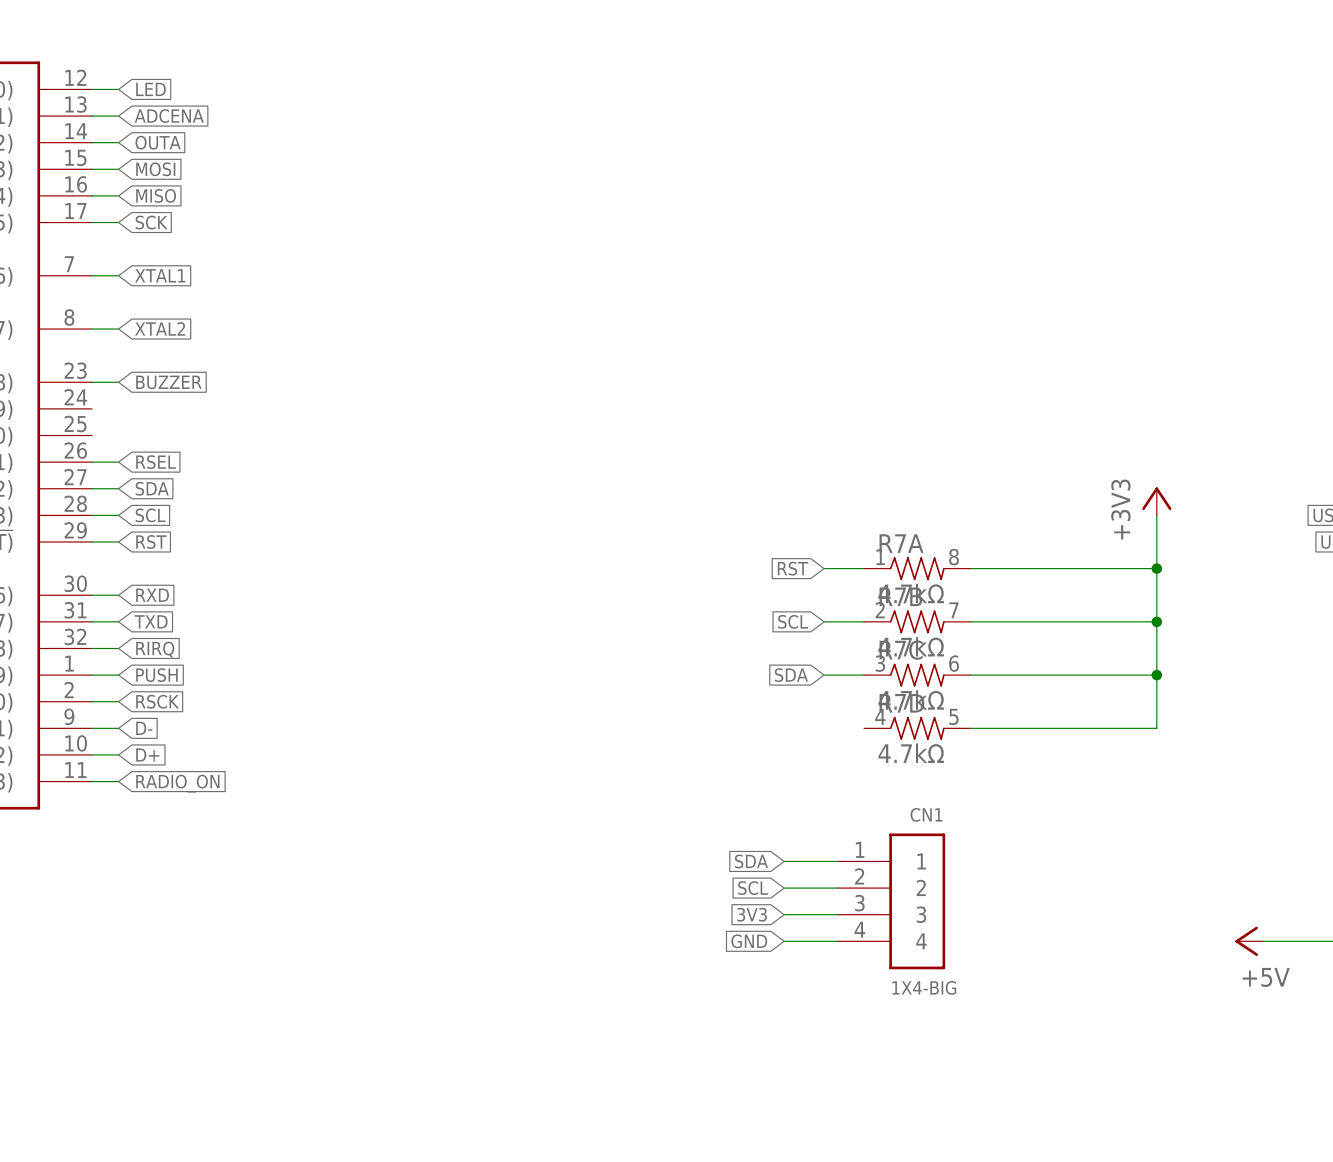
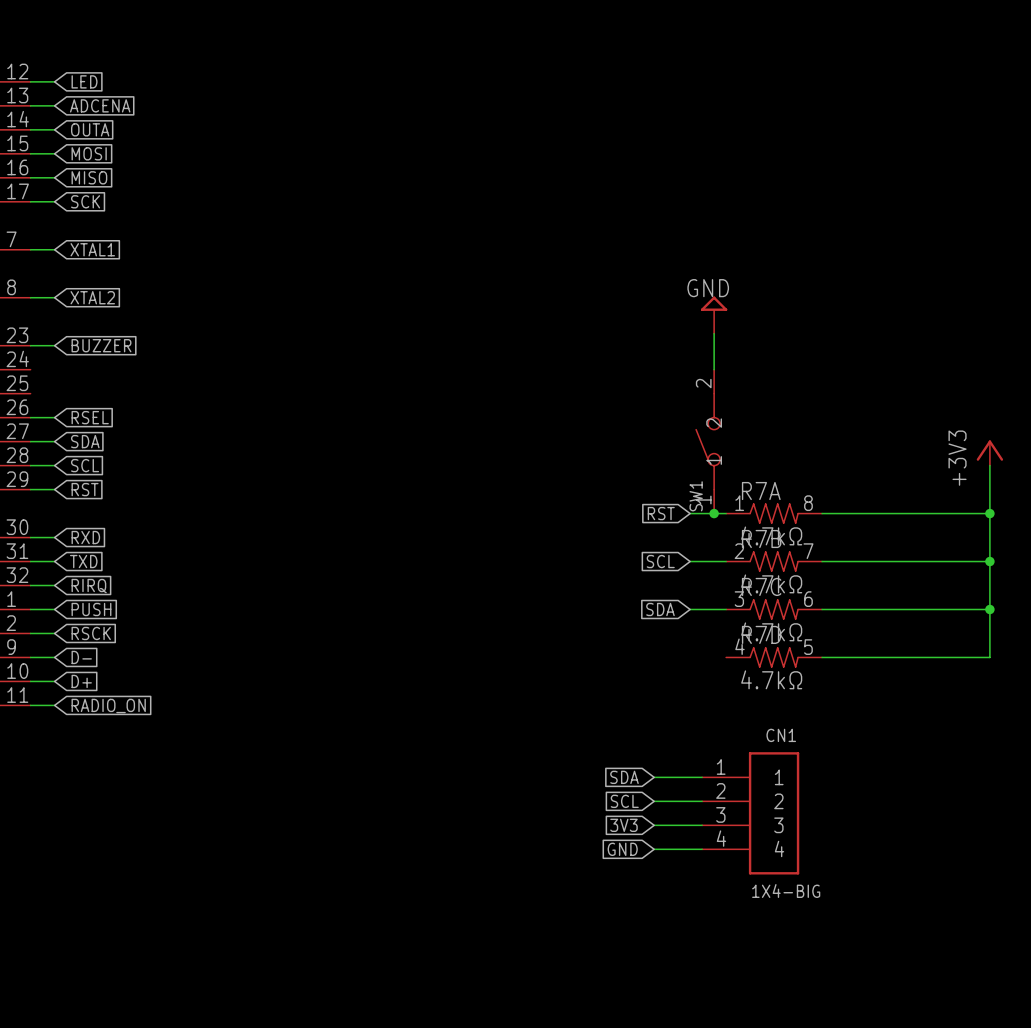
power symbol: none -> GND (714, 315)
wire: none -> (714, 333) (714, 369)
SW1: none -> (708, 441)
junction: none -> (714, 513)

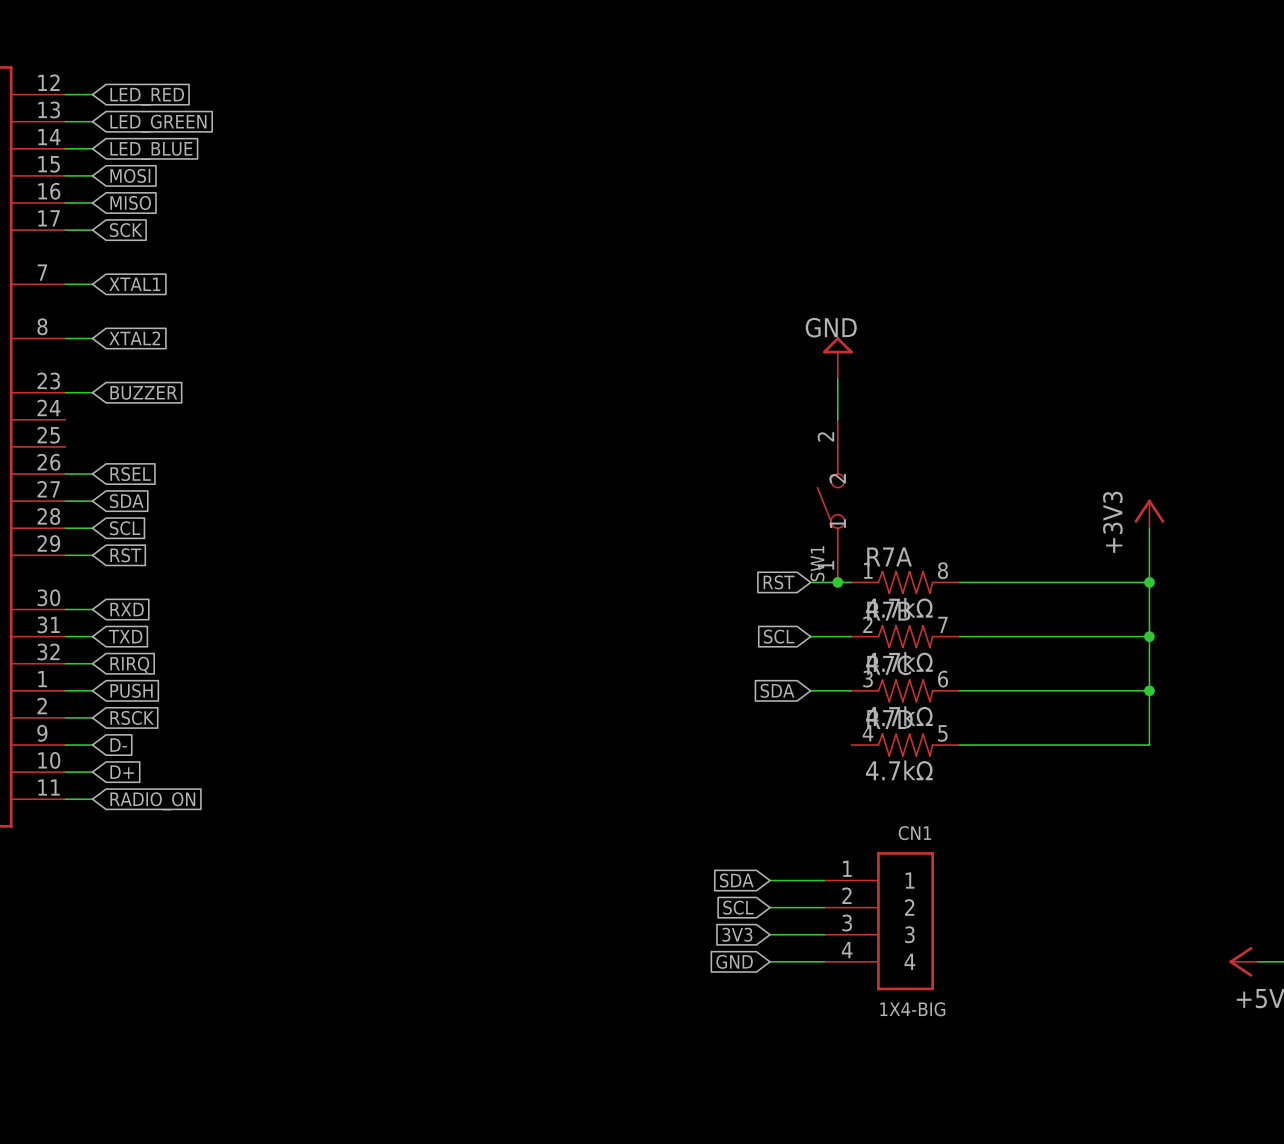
global label: LED (84, 81) -> LED_RED (147, 96)
global label: ADCENA (100, 105) -> LED_GREEN (158, 123)
global label: OUTA (90, 129) -> LED_BLUE (151, 150)

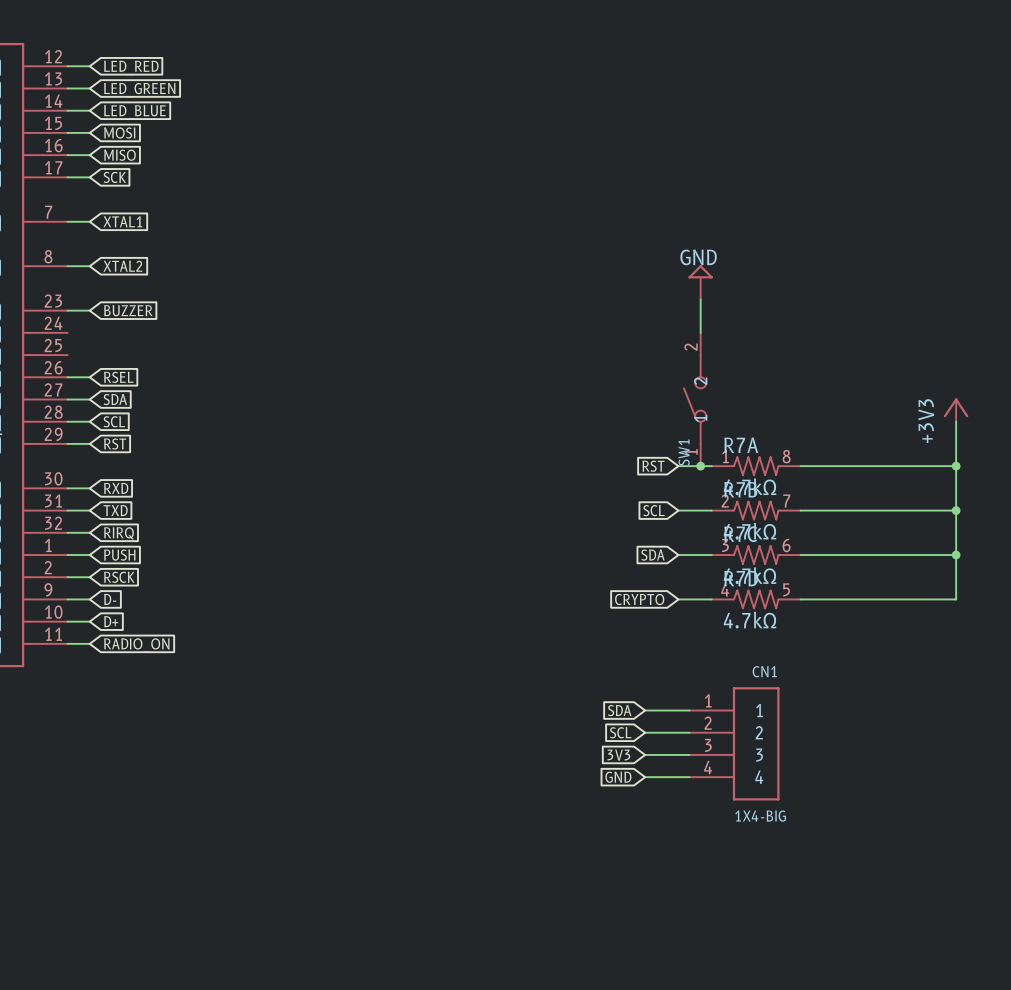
global label: none -> CRYPTO (639, 599)
wire: none -> (678, 599) (711, 599)

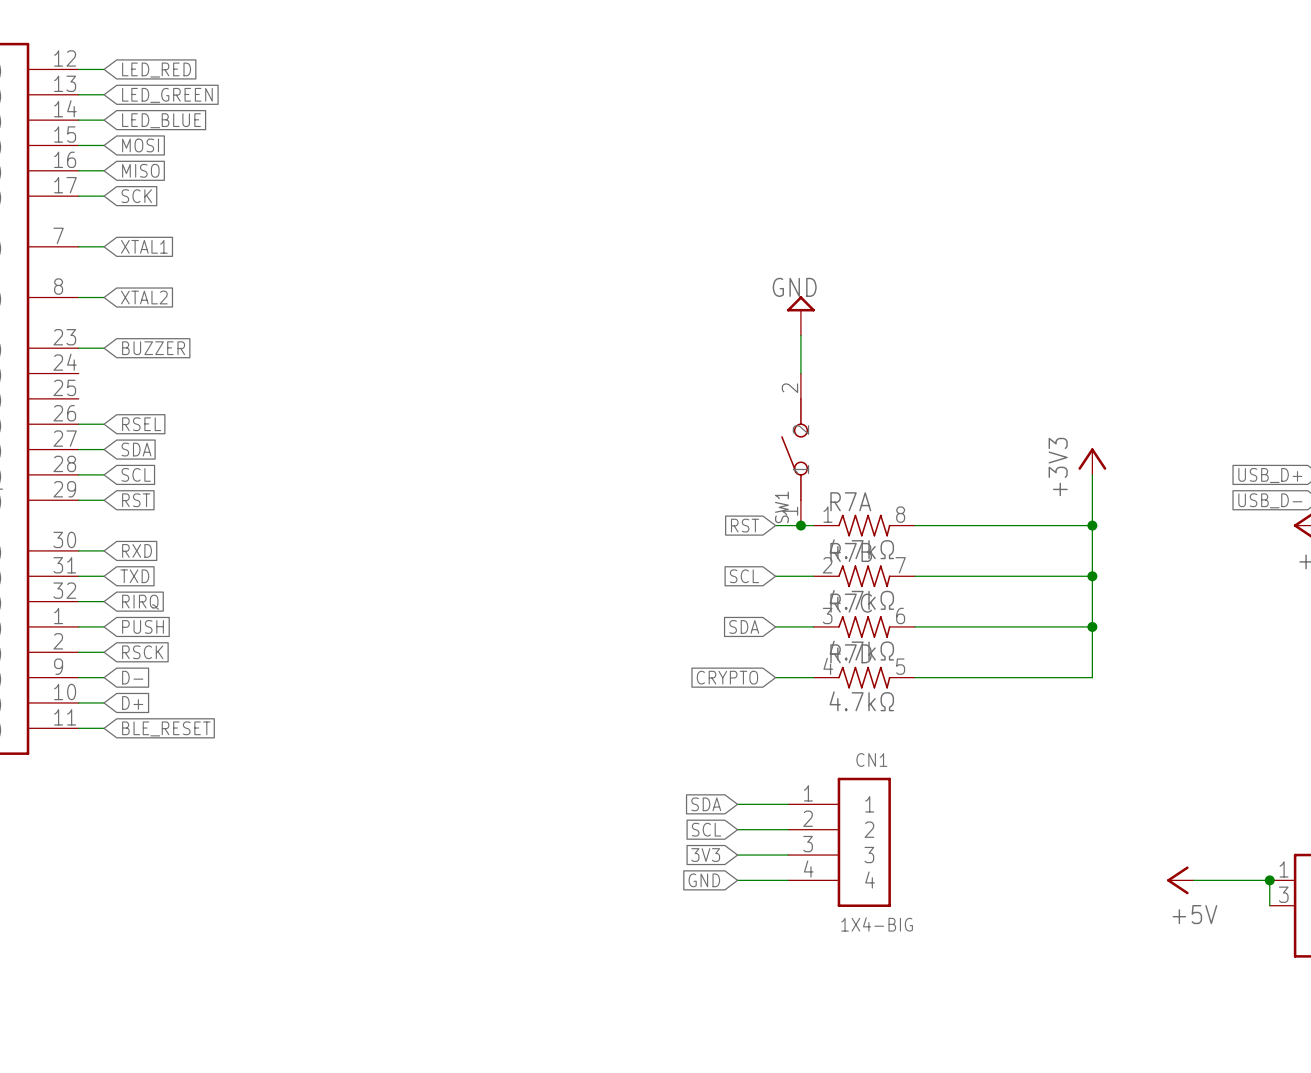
global label: RADIO_ON (136, 645) -> BLE_RESET (166, 728)

